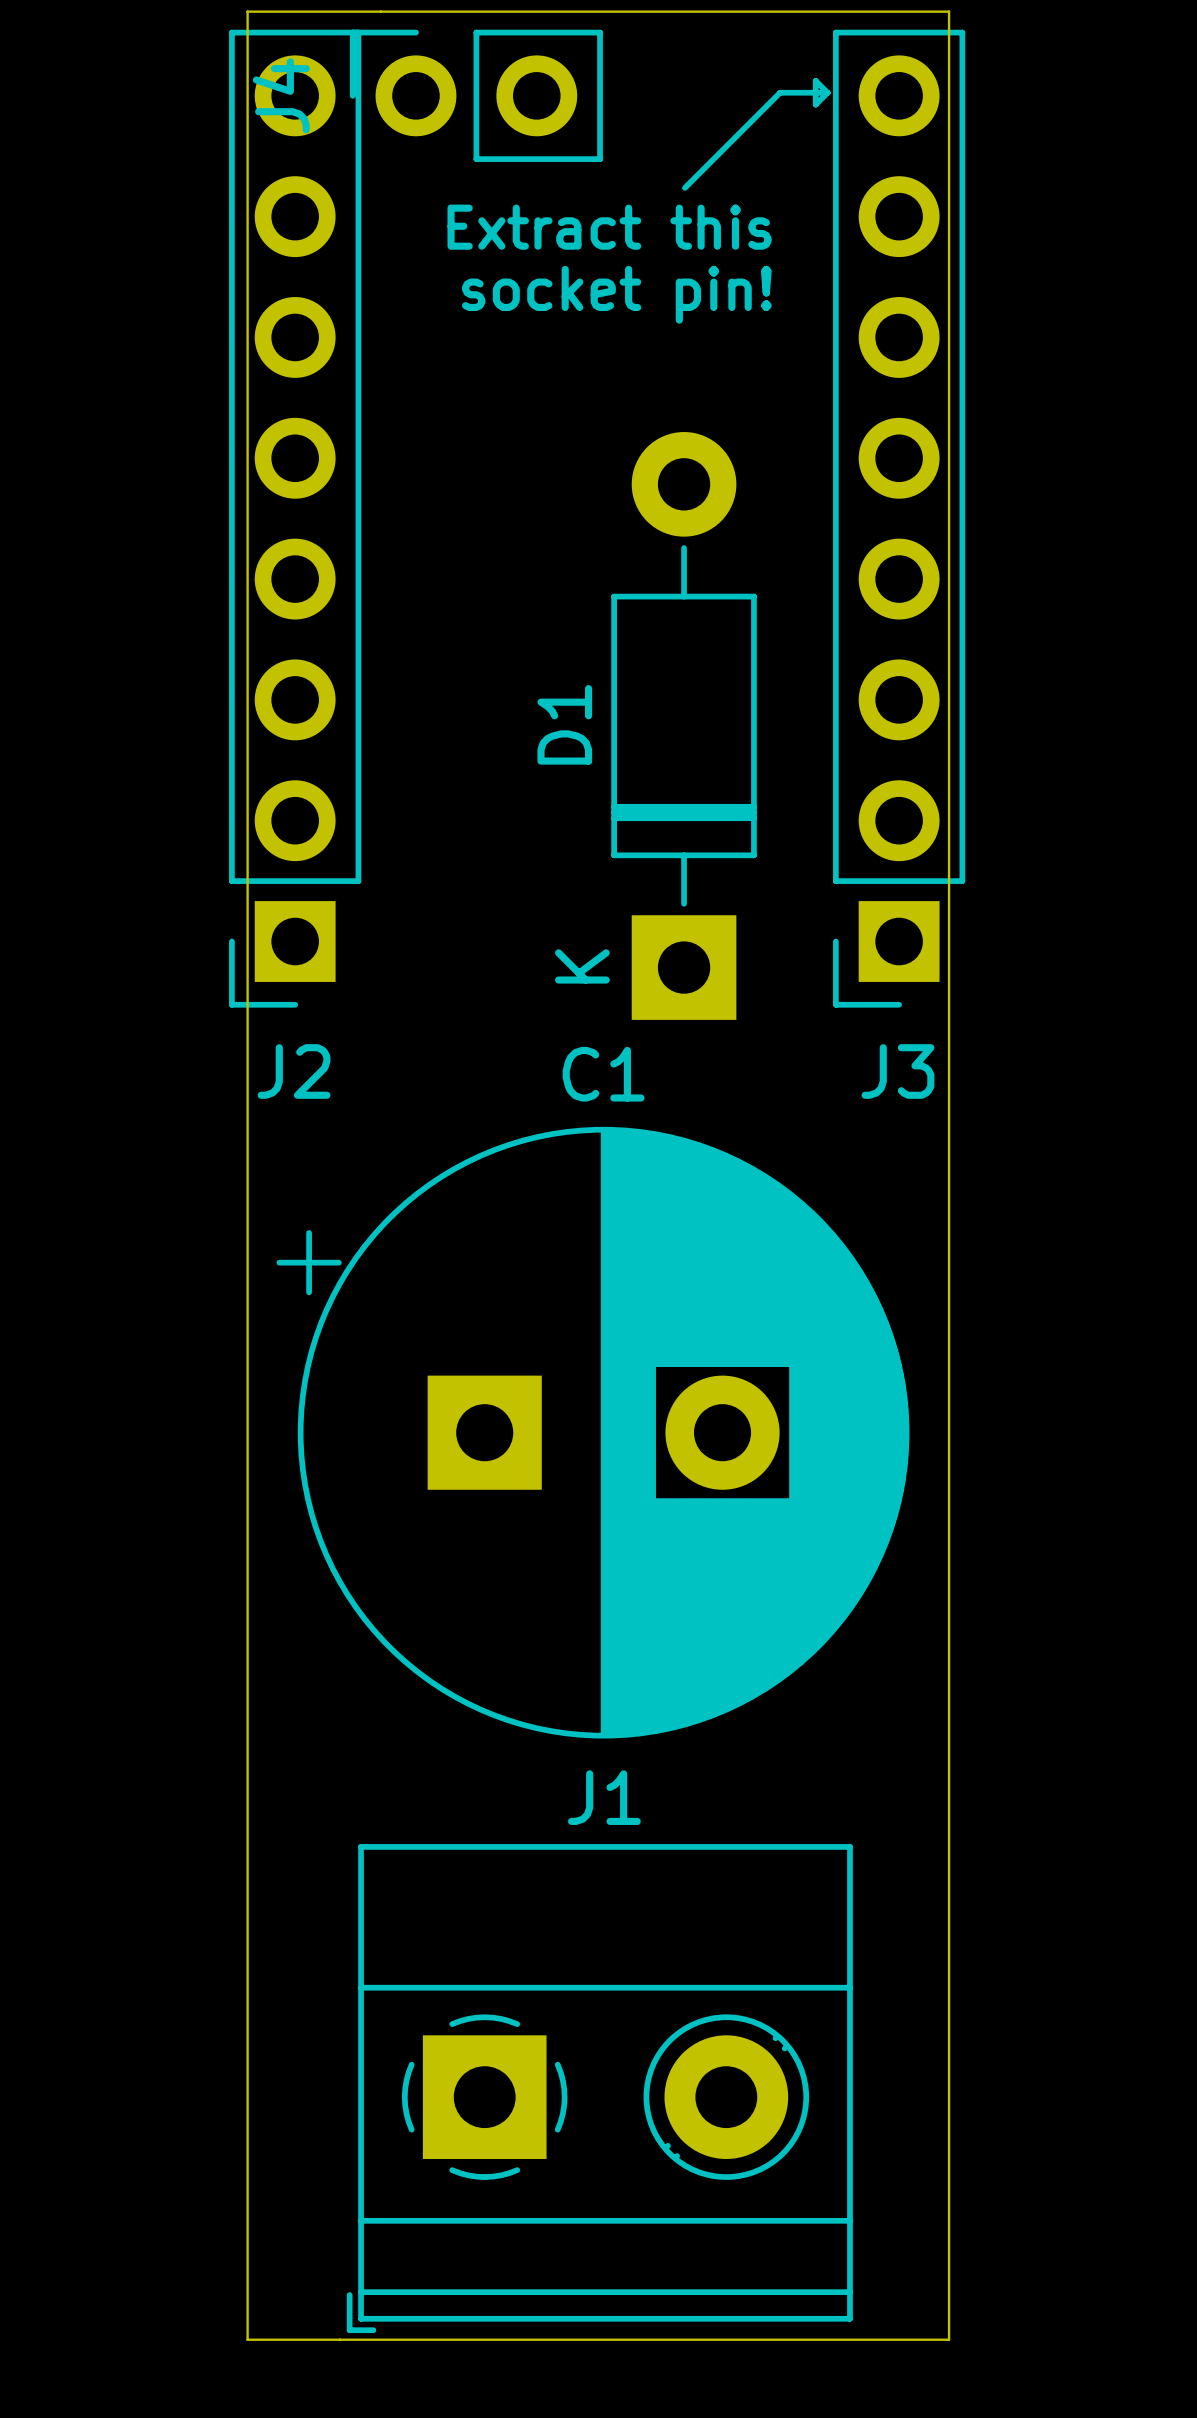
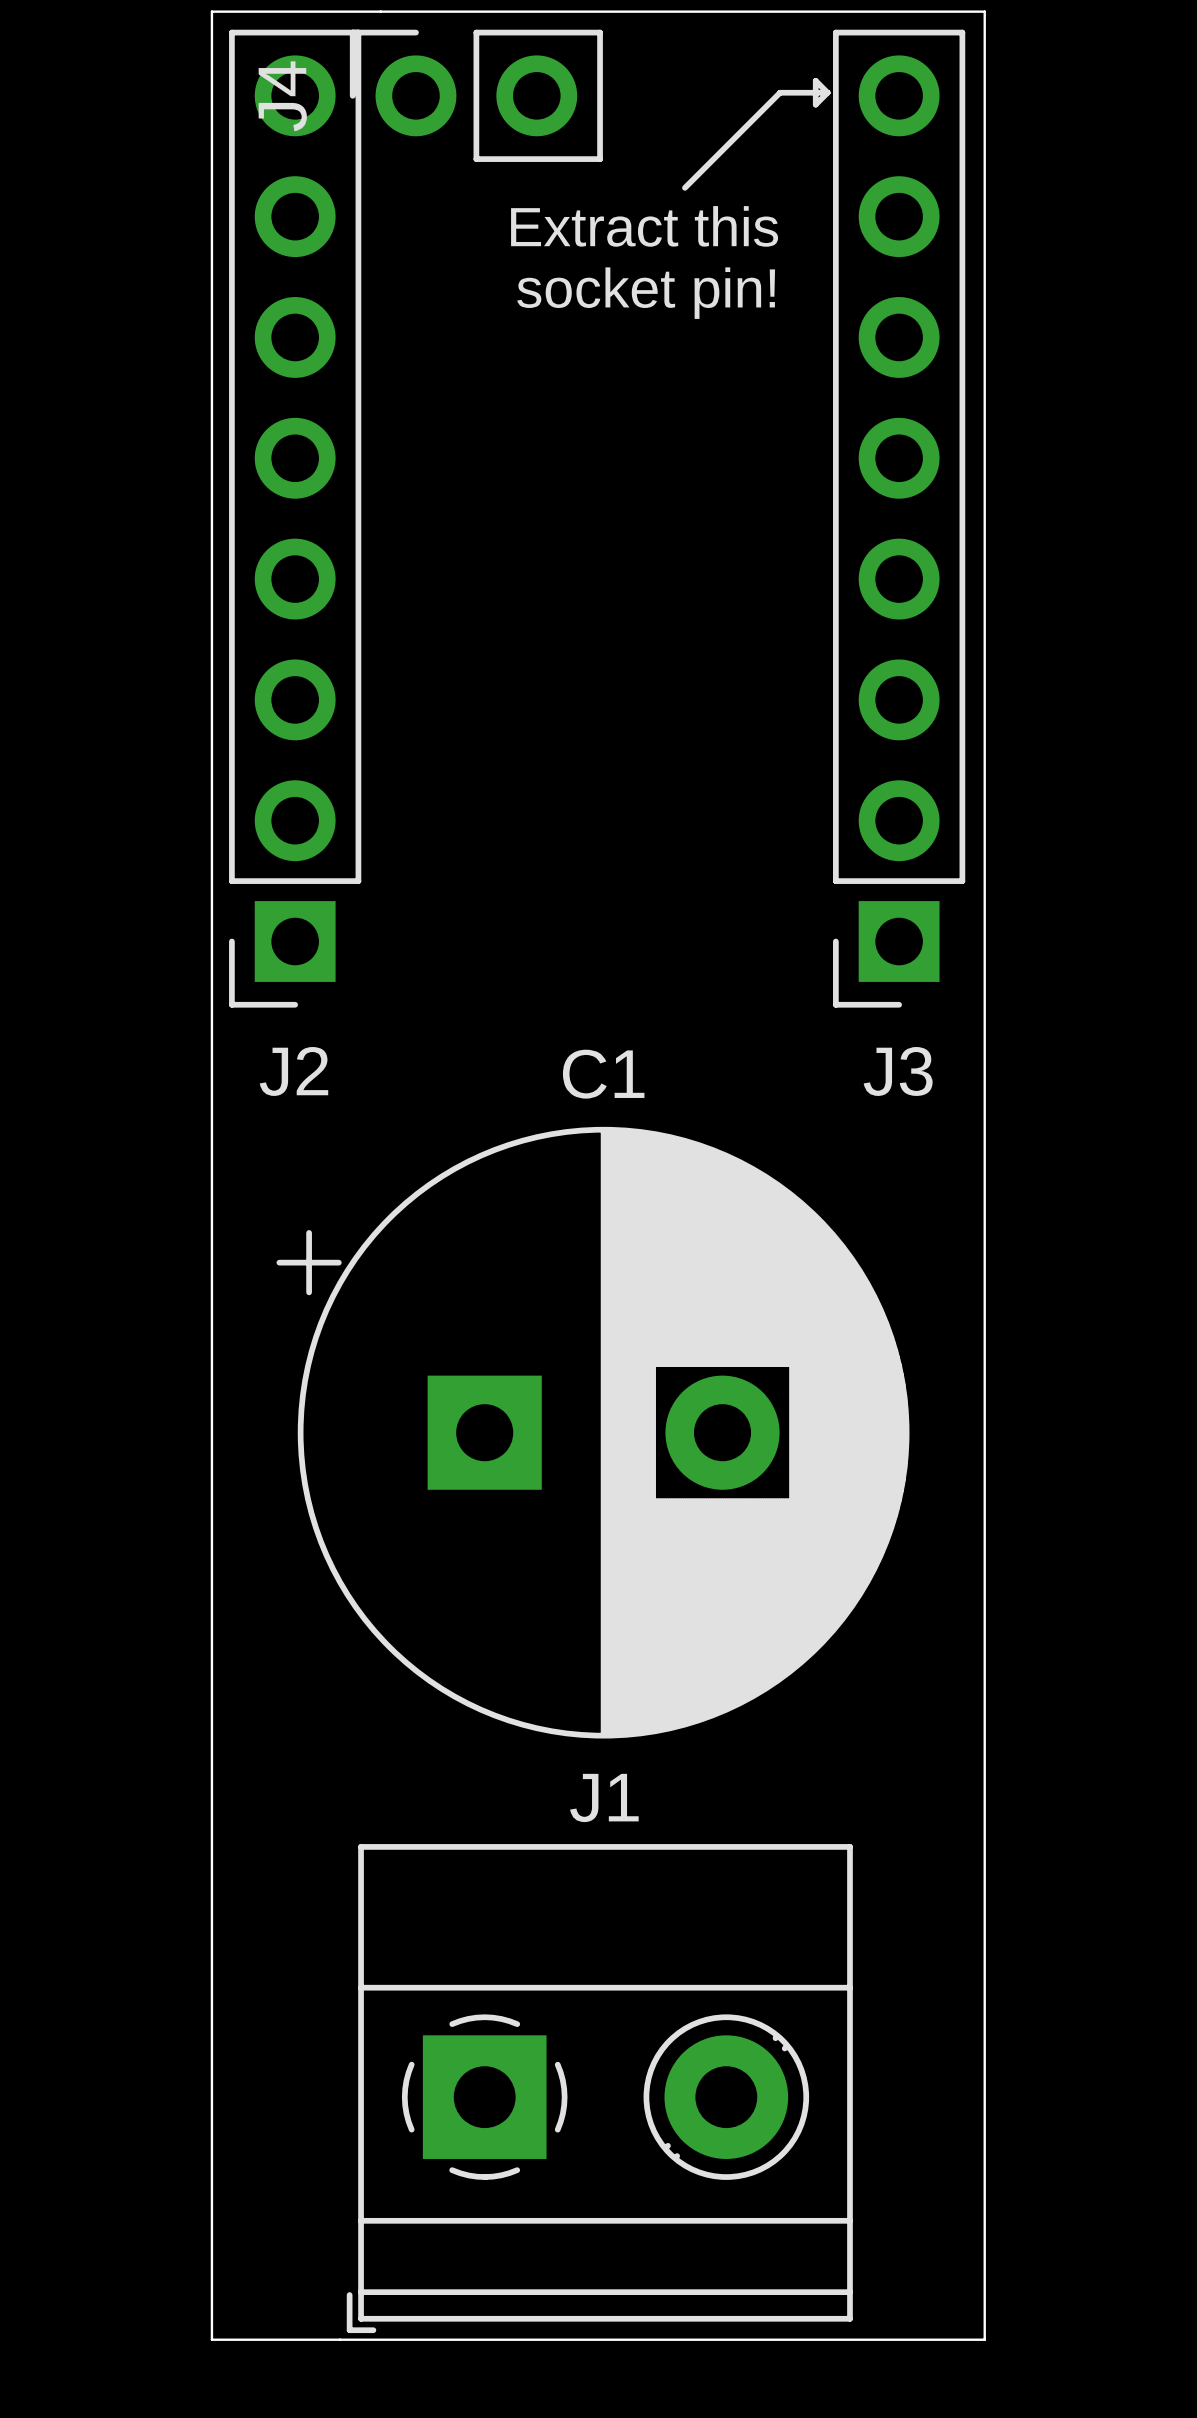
board edge: (247, 11) (247, 2339) -> (247, 11) (211, 11) (211, 2339) (247, 2339)
board edge: (949, 11) (949, 2339) -> (949, 11) (984, 11) (984, 2339) (949, 2339)
D1: (684, 725) -> none

